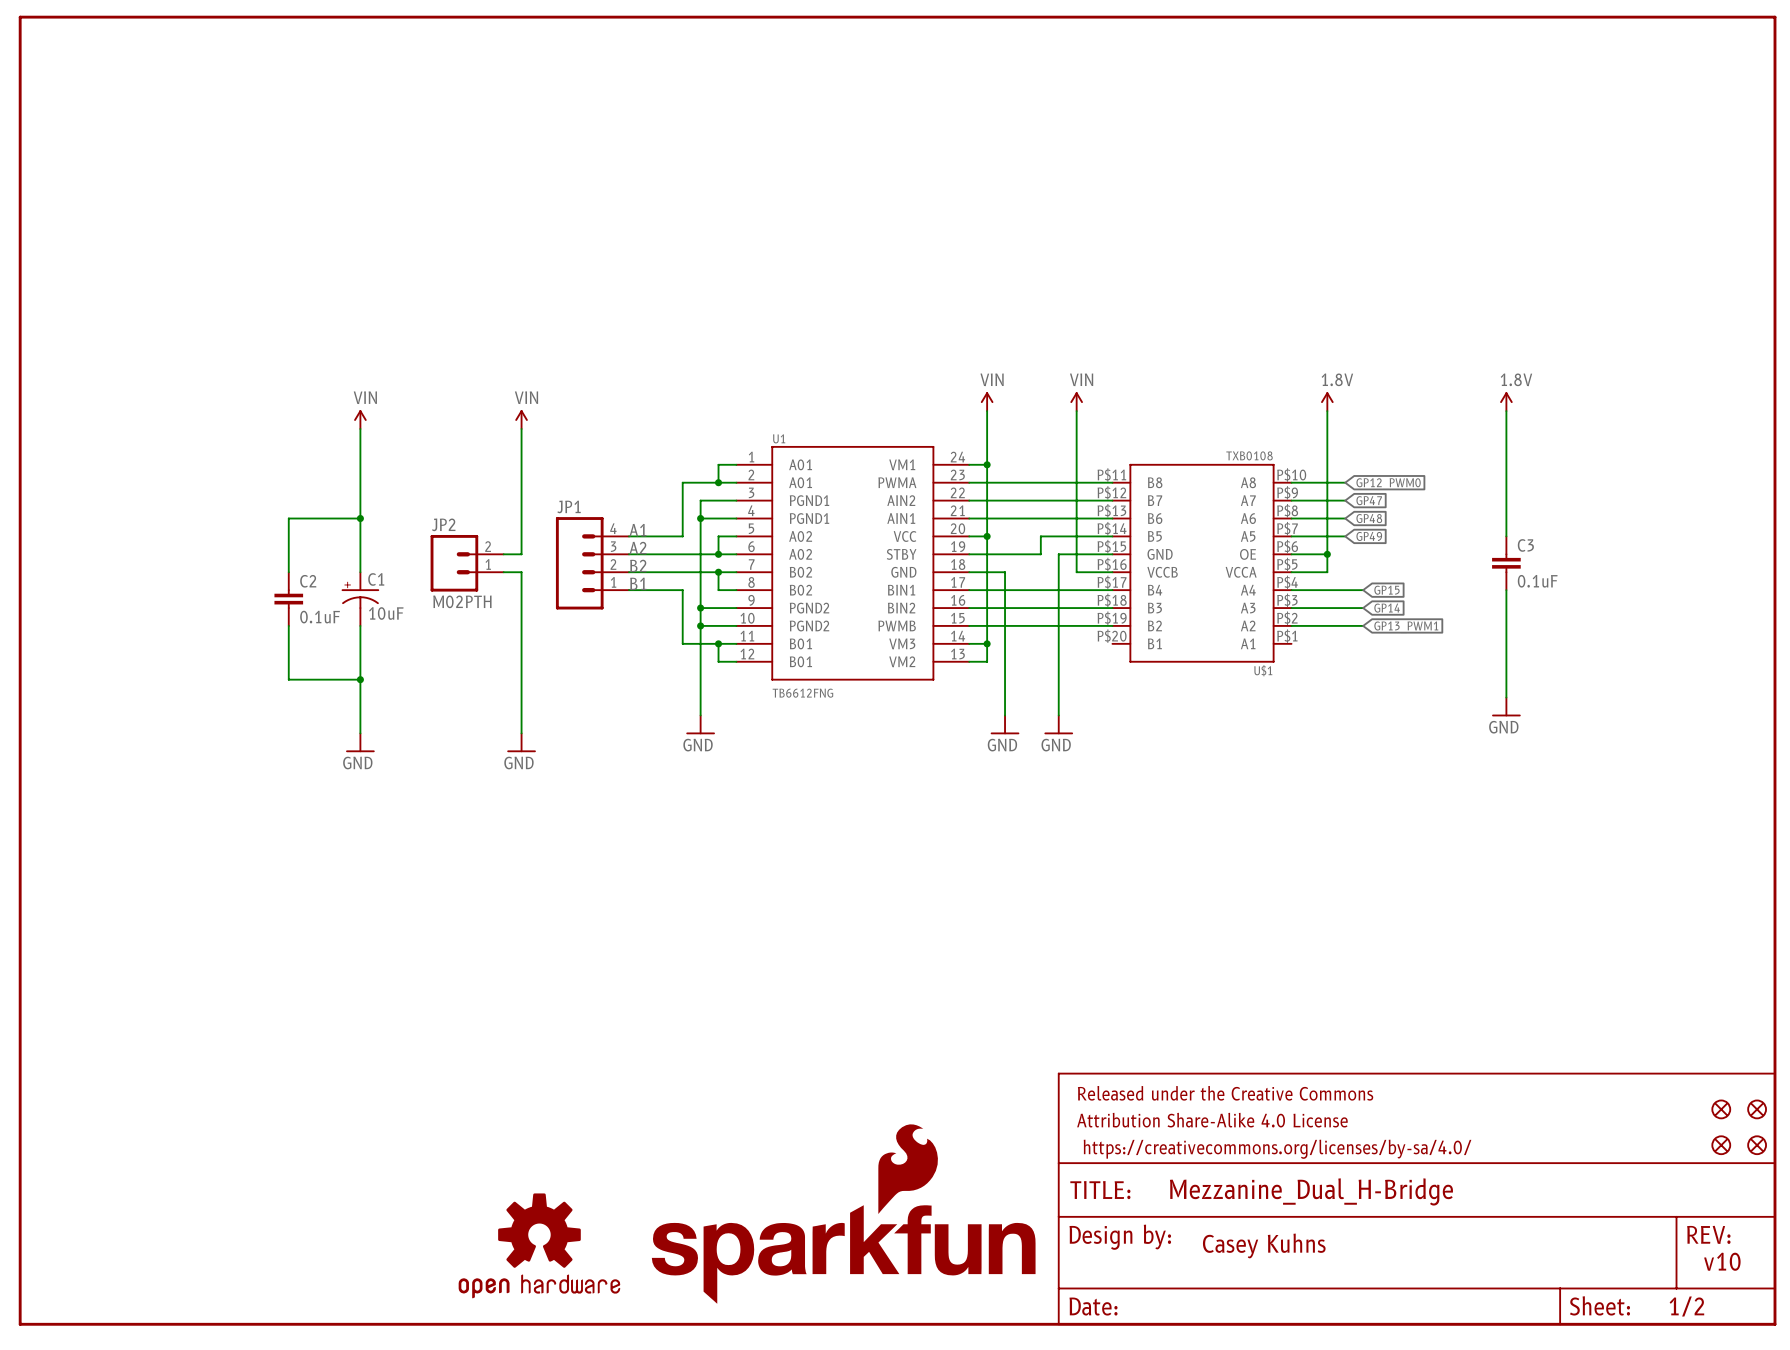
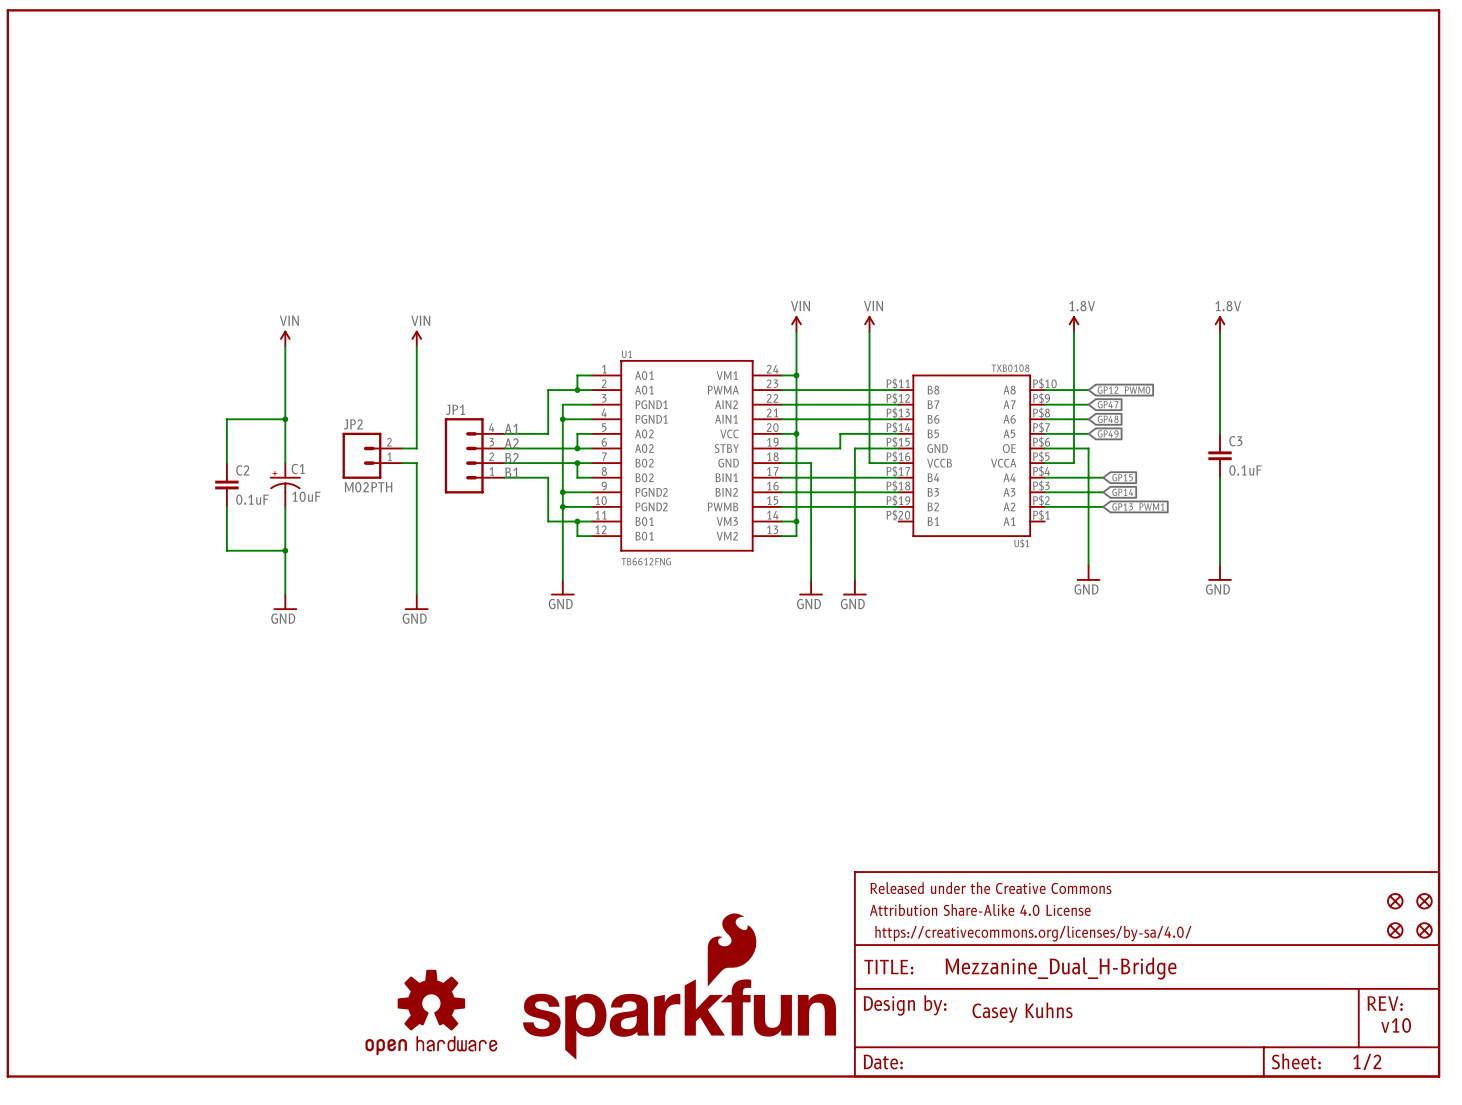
wire: none -> (1073, 448) (1088, 448) (1088, 565)
junction: (1327, 554) -> none
power symbol: none -> GND (1088, 573)

